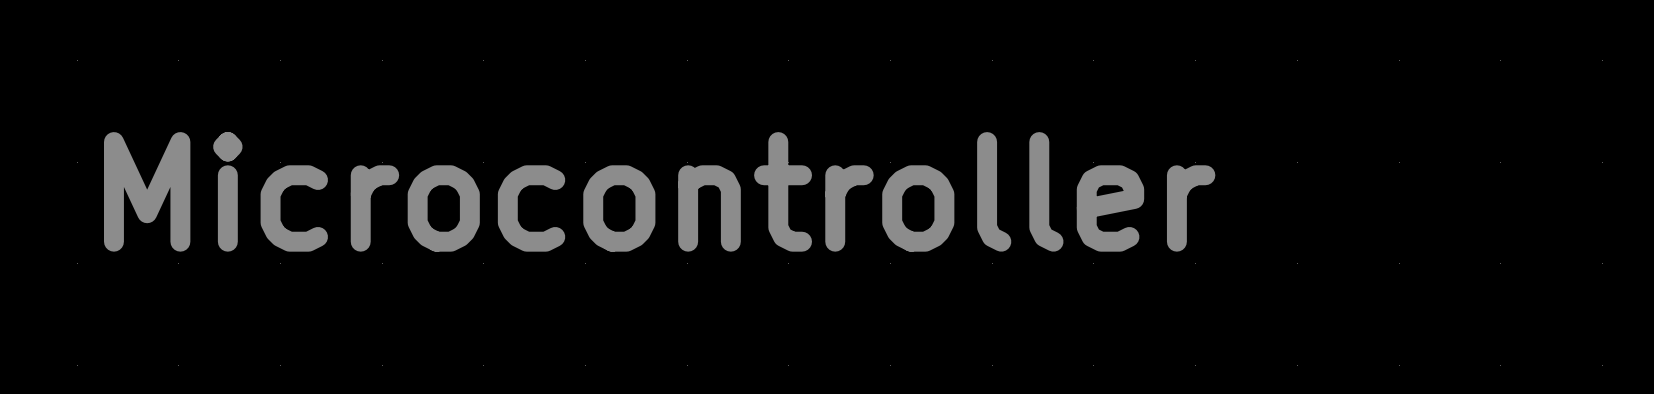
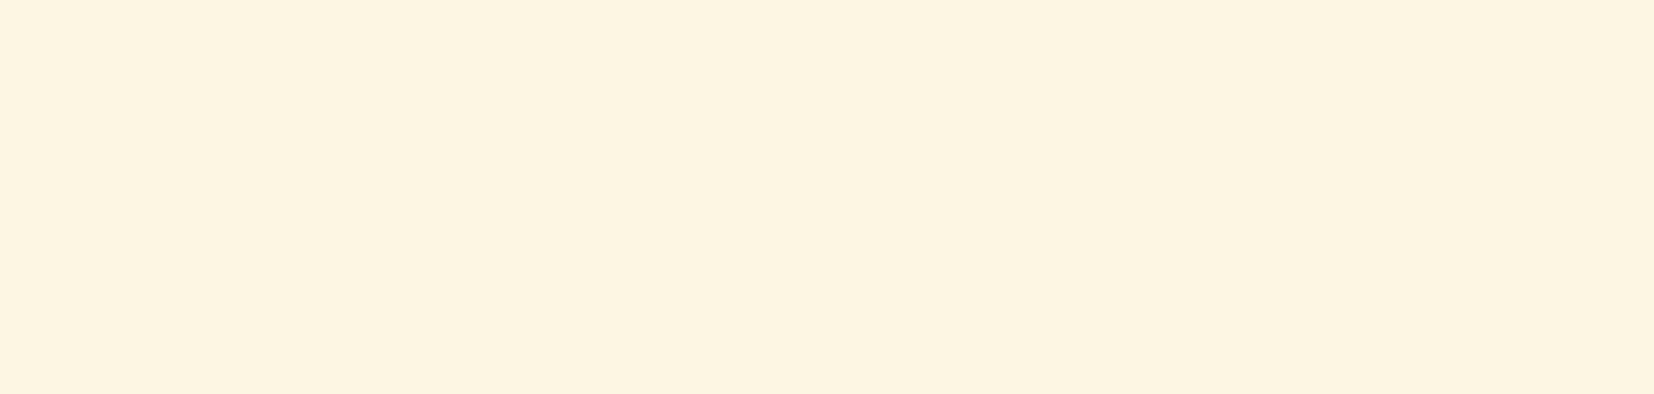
text: Microcontroller (659, 191) -> none

